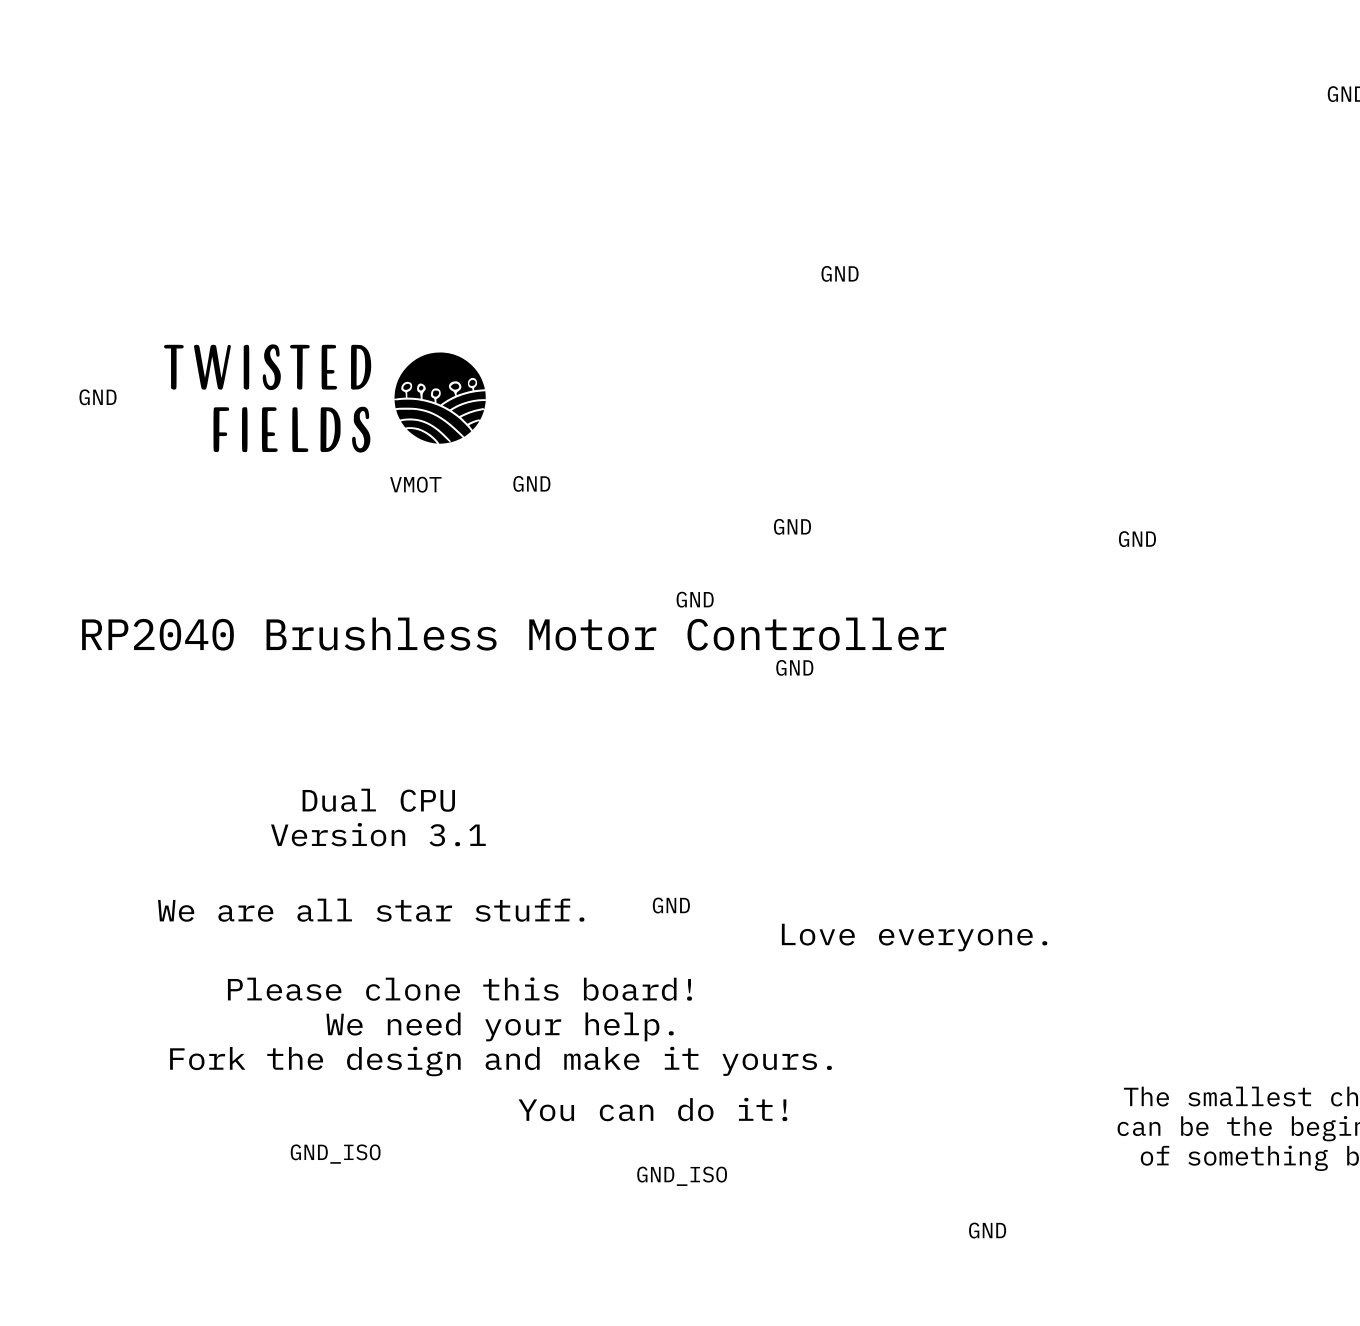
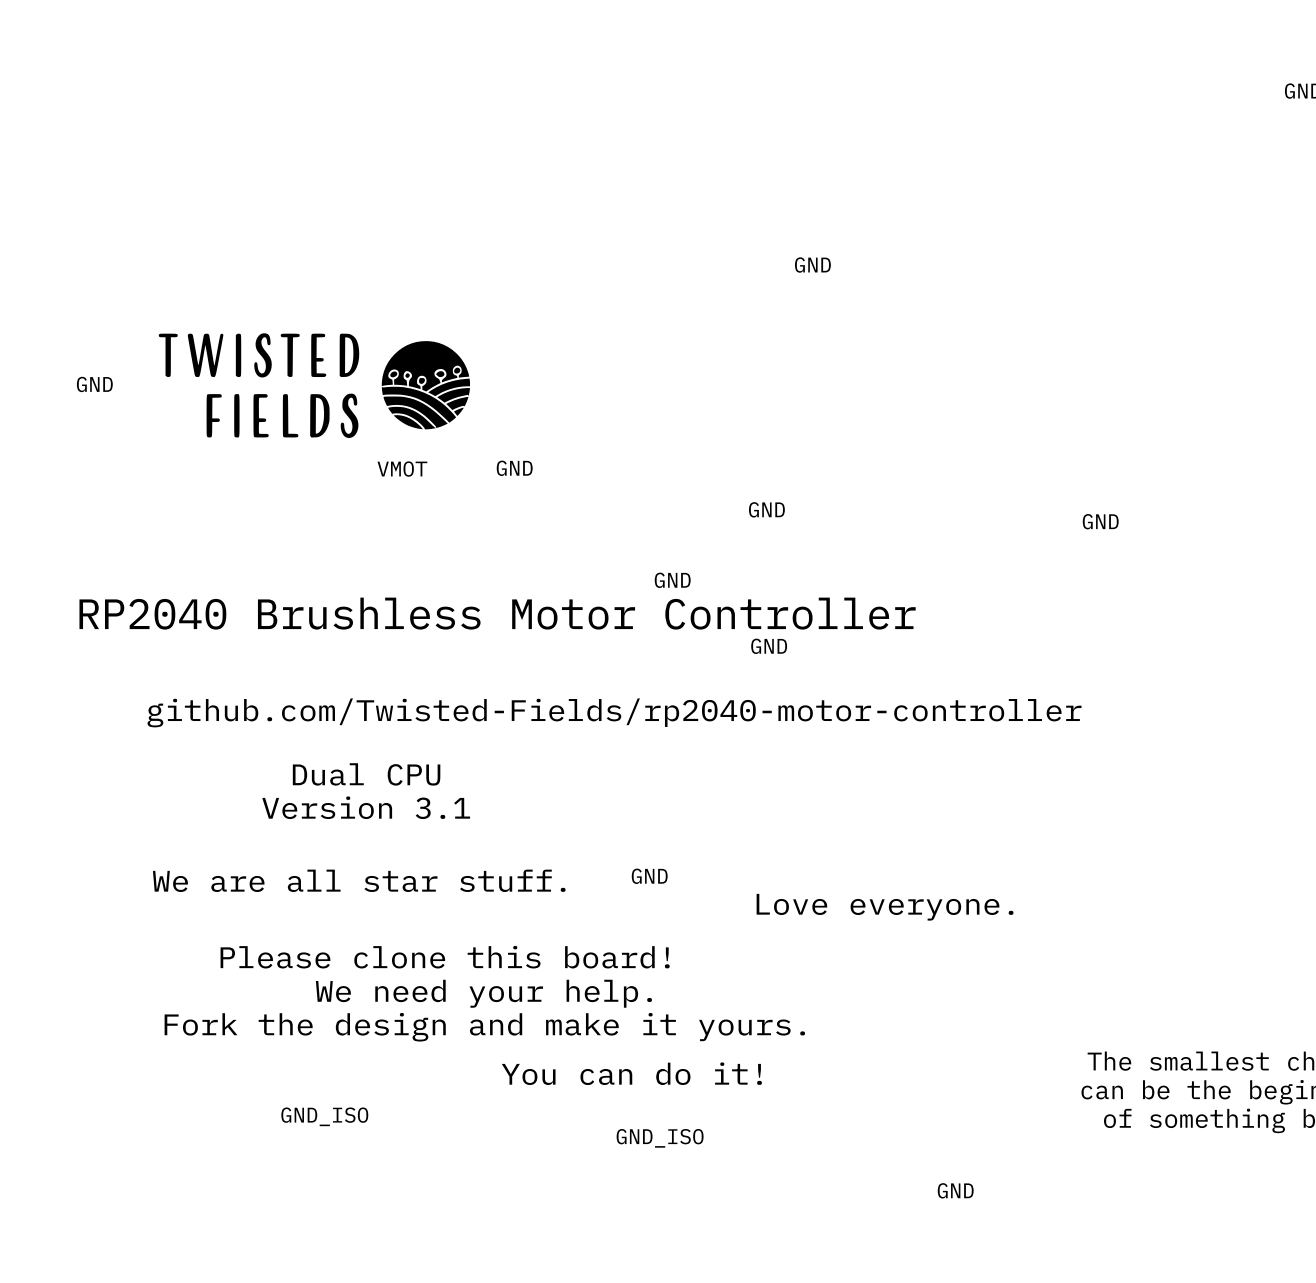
text: none -> github.com/Twisted-Fields/rp2040-motor-controller (614, 712)

